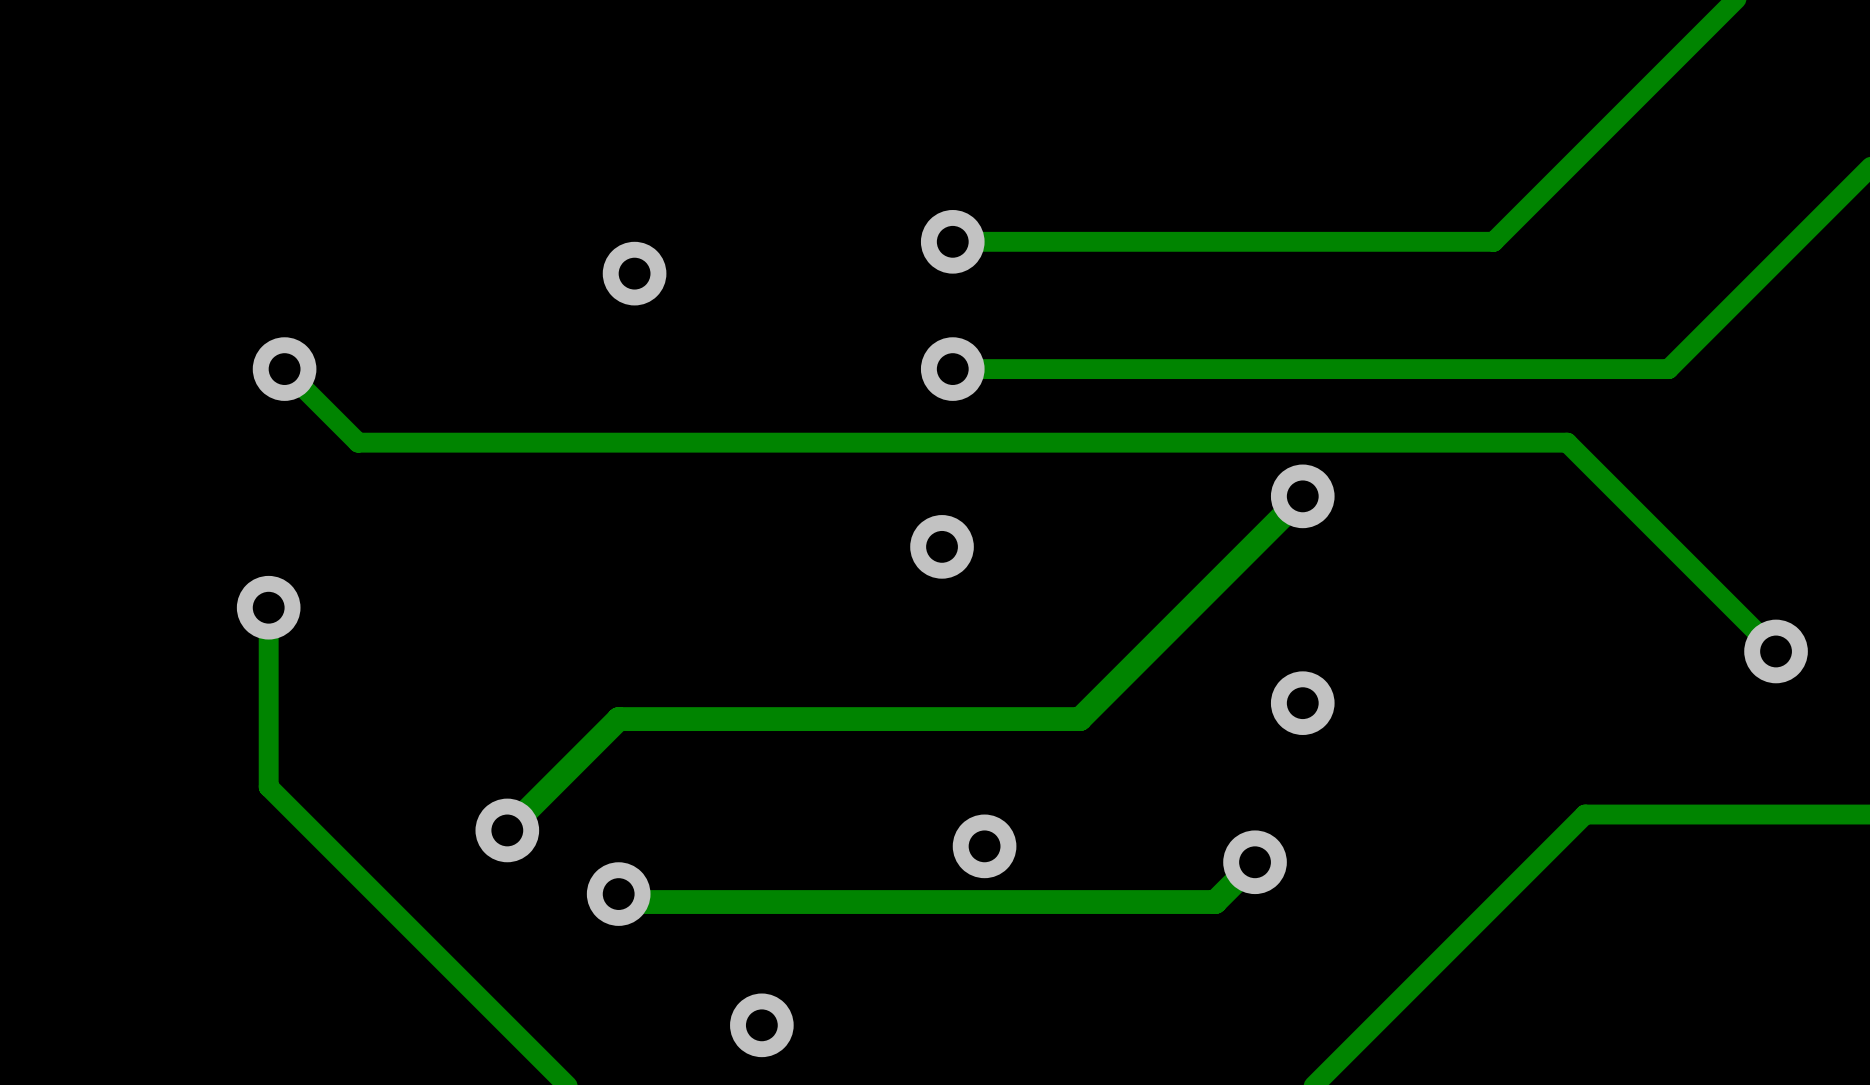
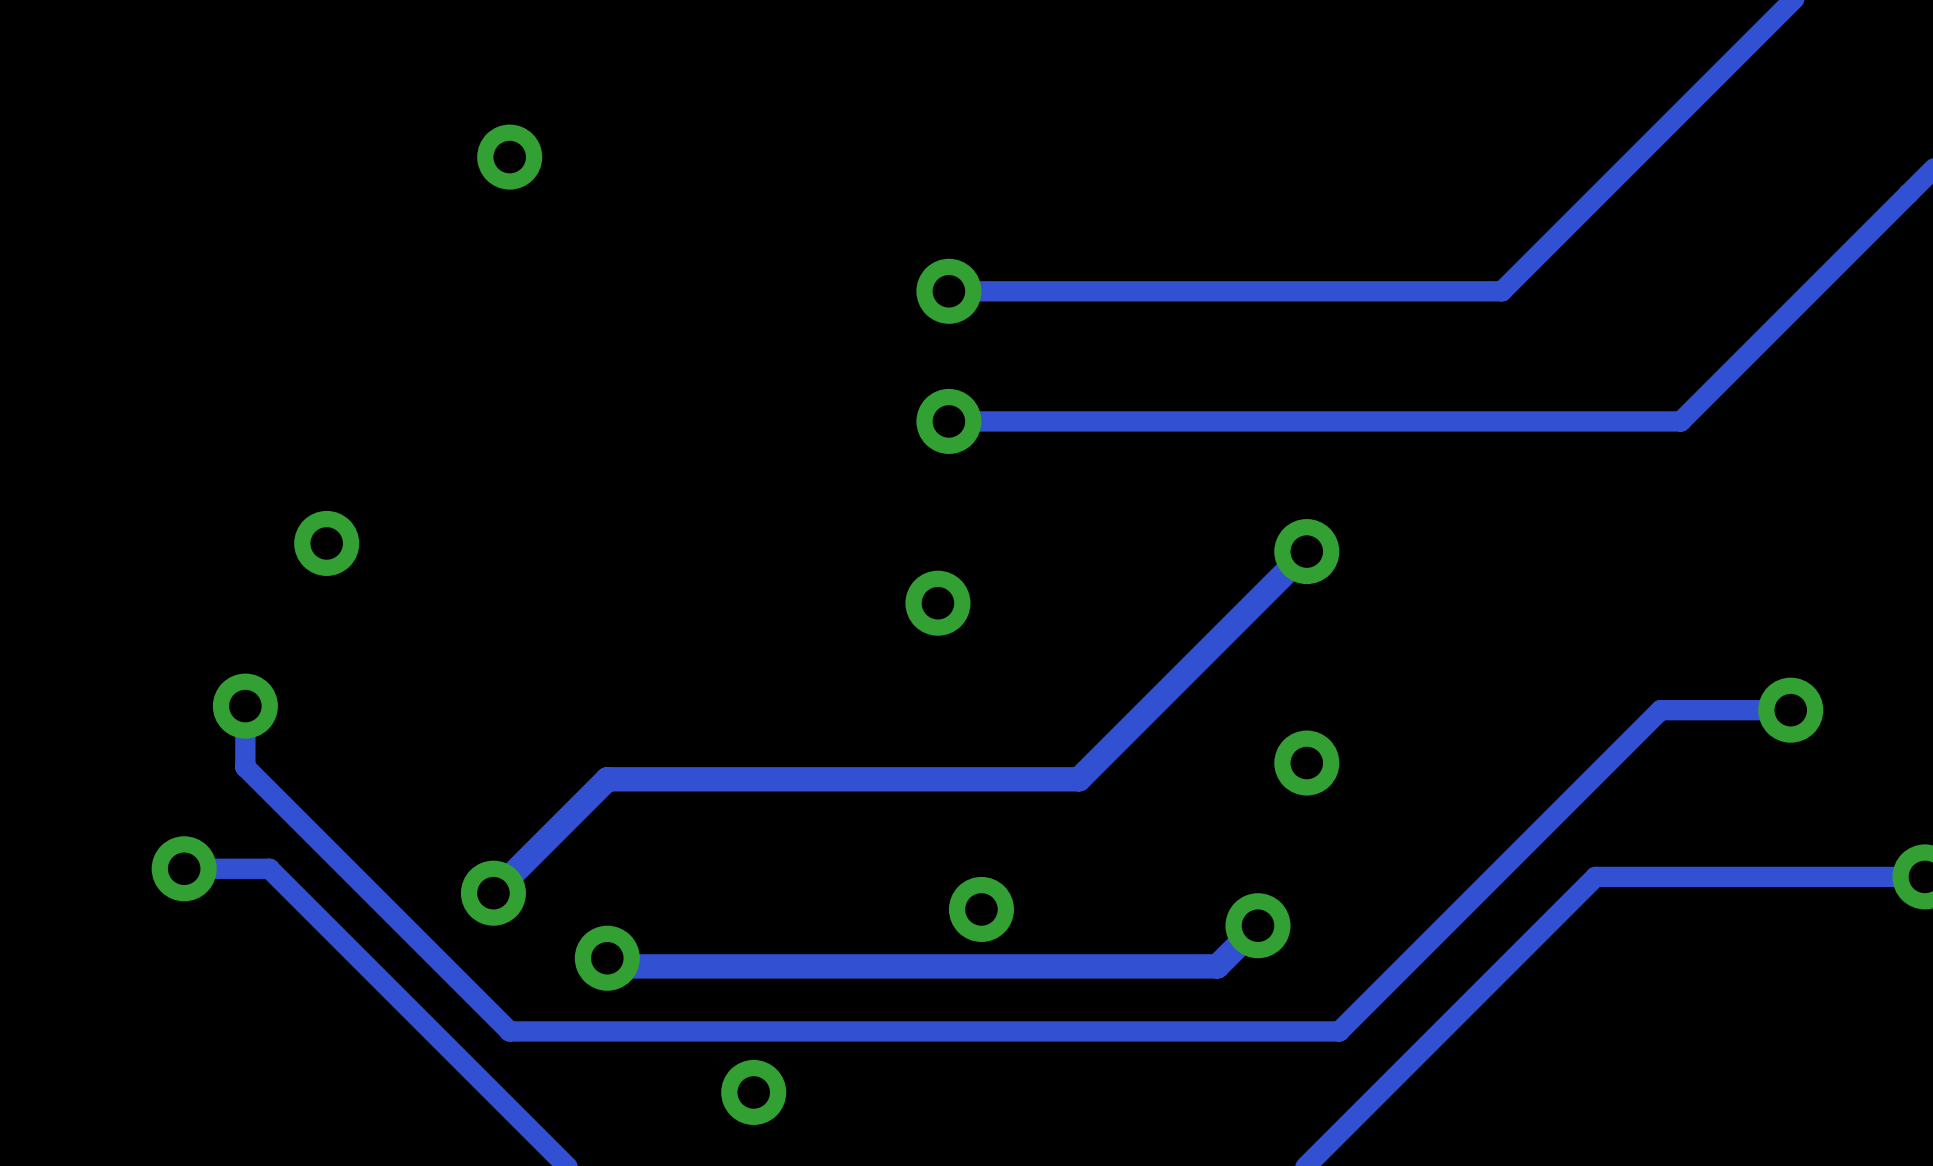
via: none -> (509, 157)
via: (634, 273) -> none
track: (284, 369) (358, 442) (1567, 442) (1776, 651) -> (245, 706) (245, 767) (509, 1031) (1339, 1031) (1660, 710) (1790, 710)
via: (284, 369) -> none
via: none -> (326, 543)
track: (268, 607) (268, 787) (288, 806) -> (184, 868) (269, 868)
via position: (268, 607) -> (245, 706)
via: none -> (184, 868)

